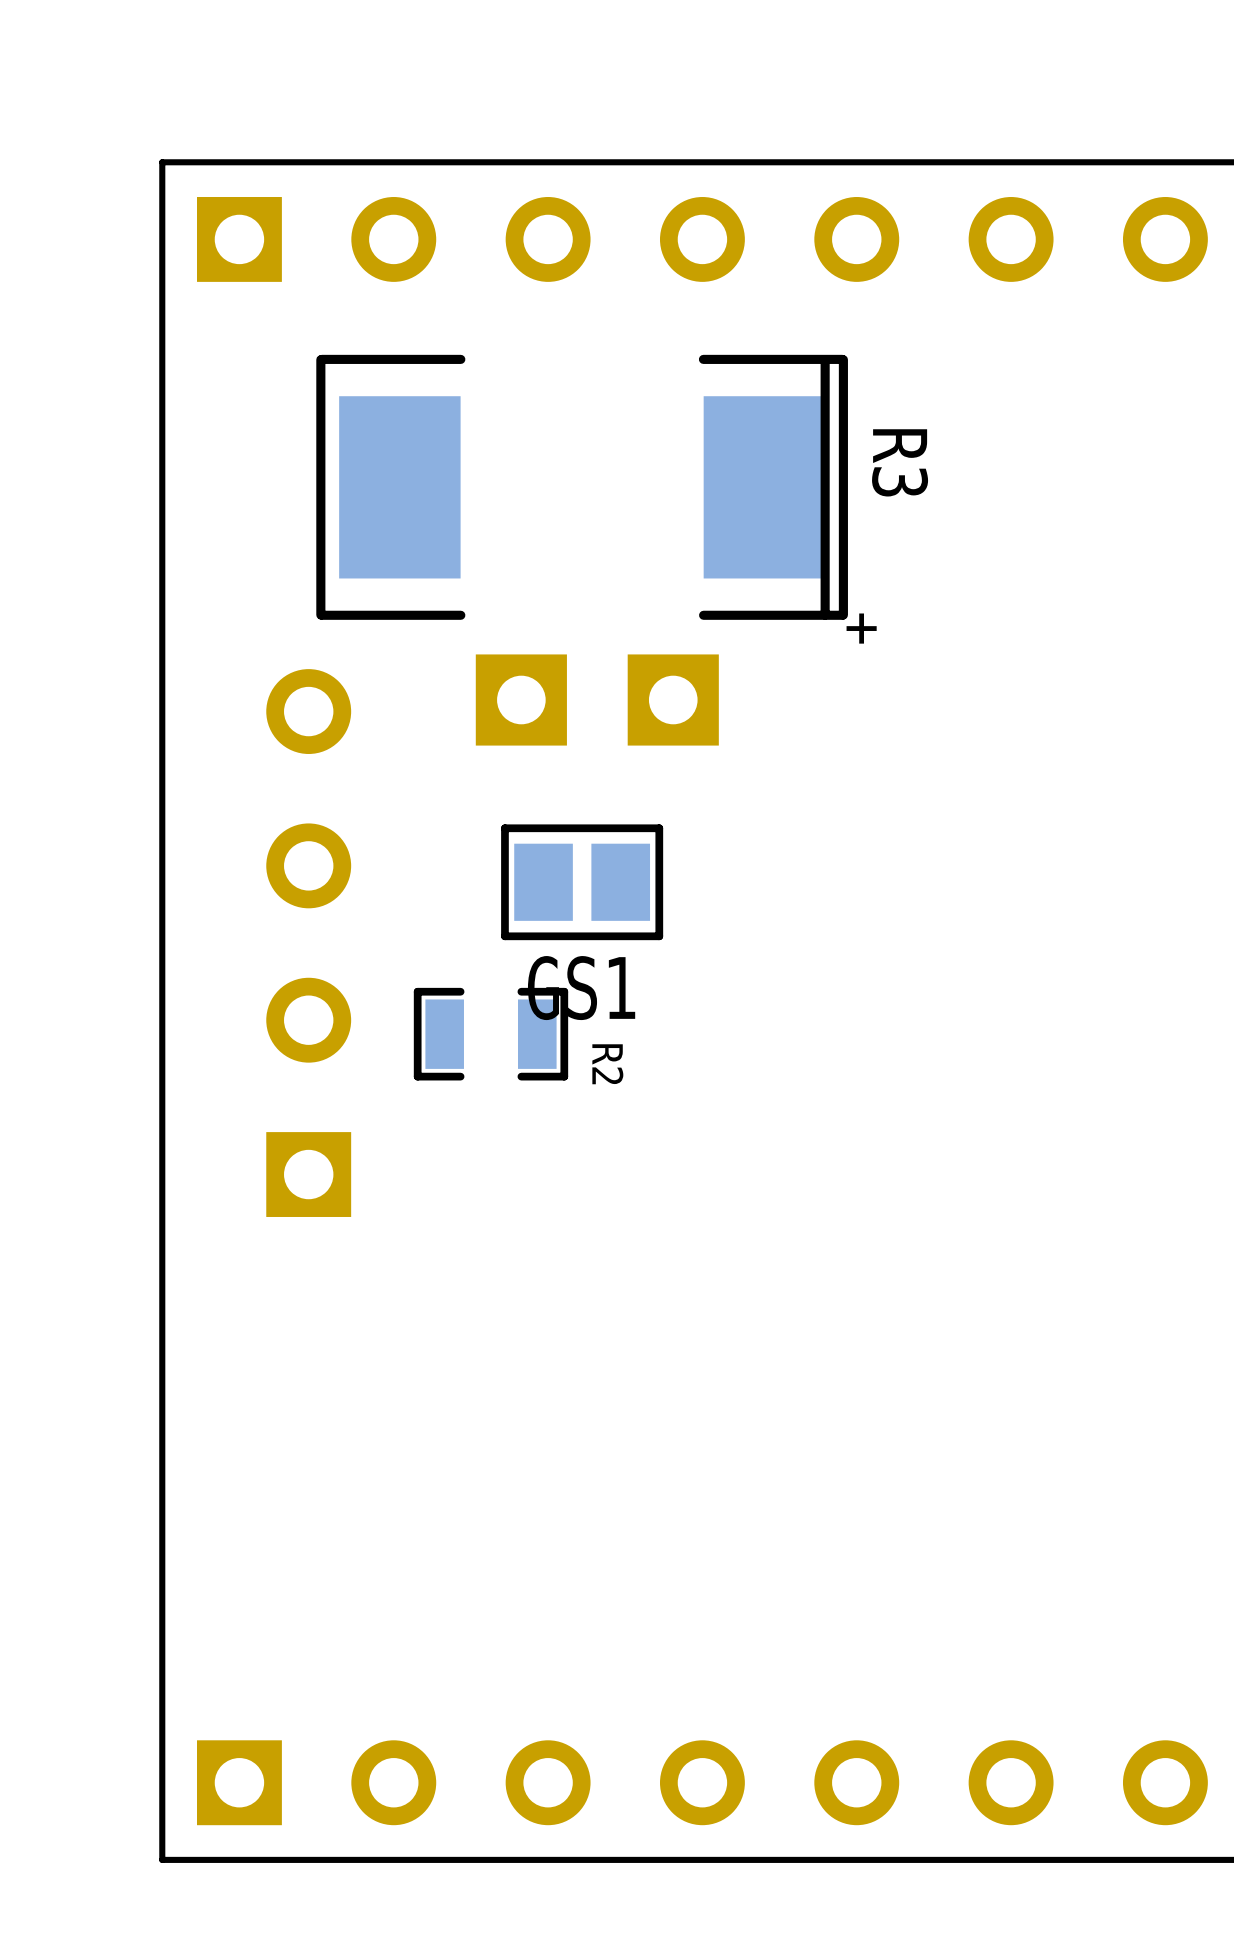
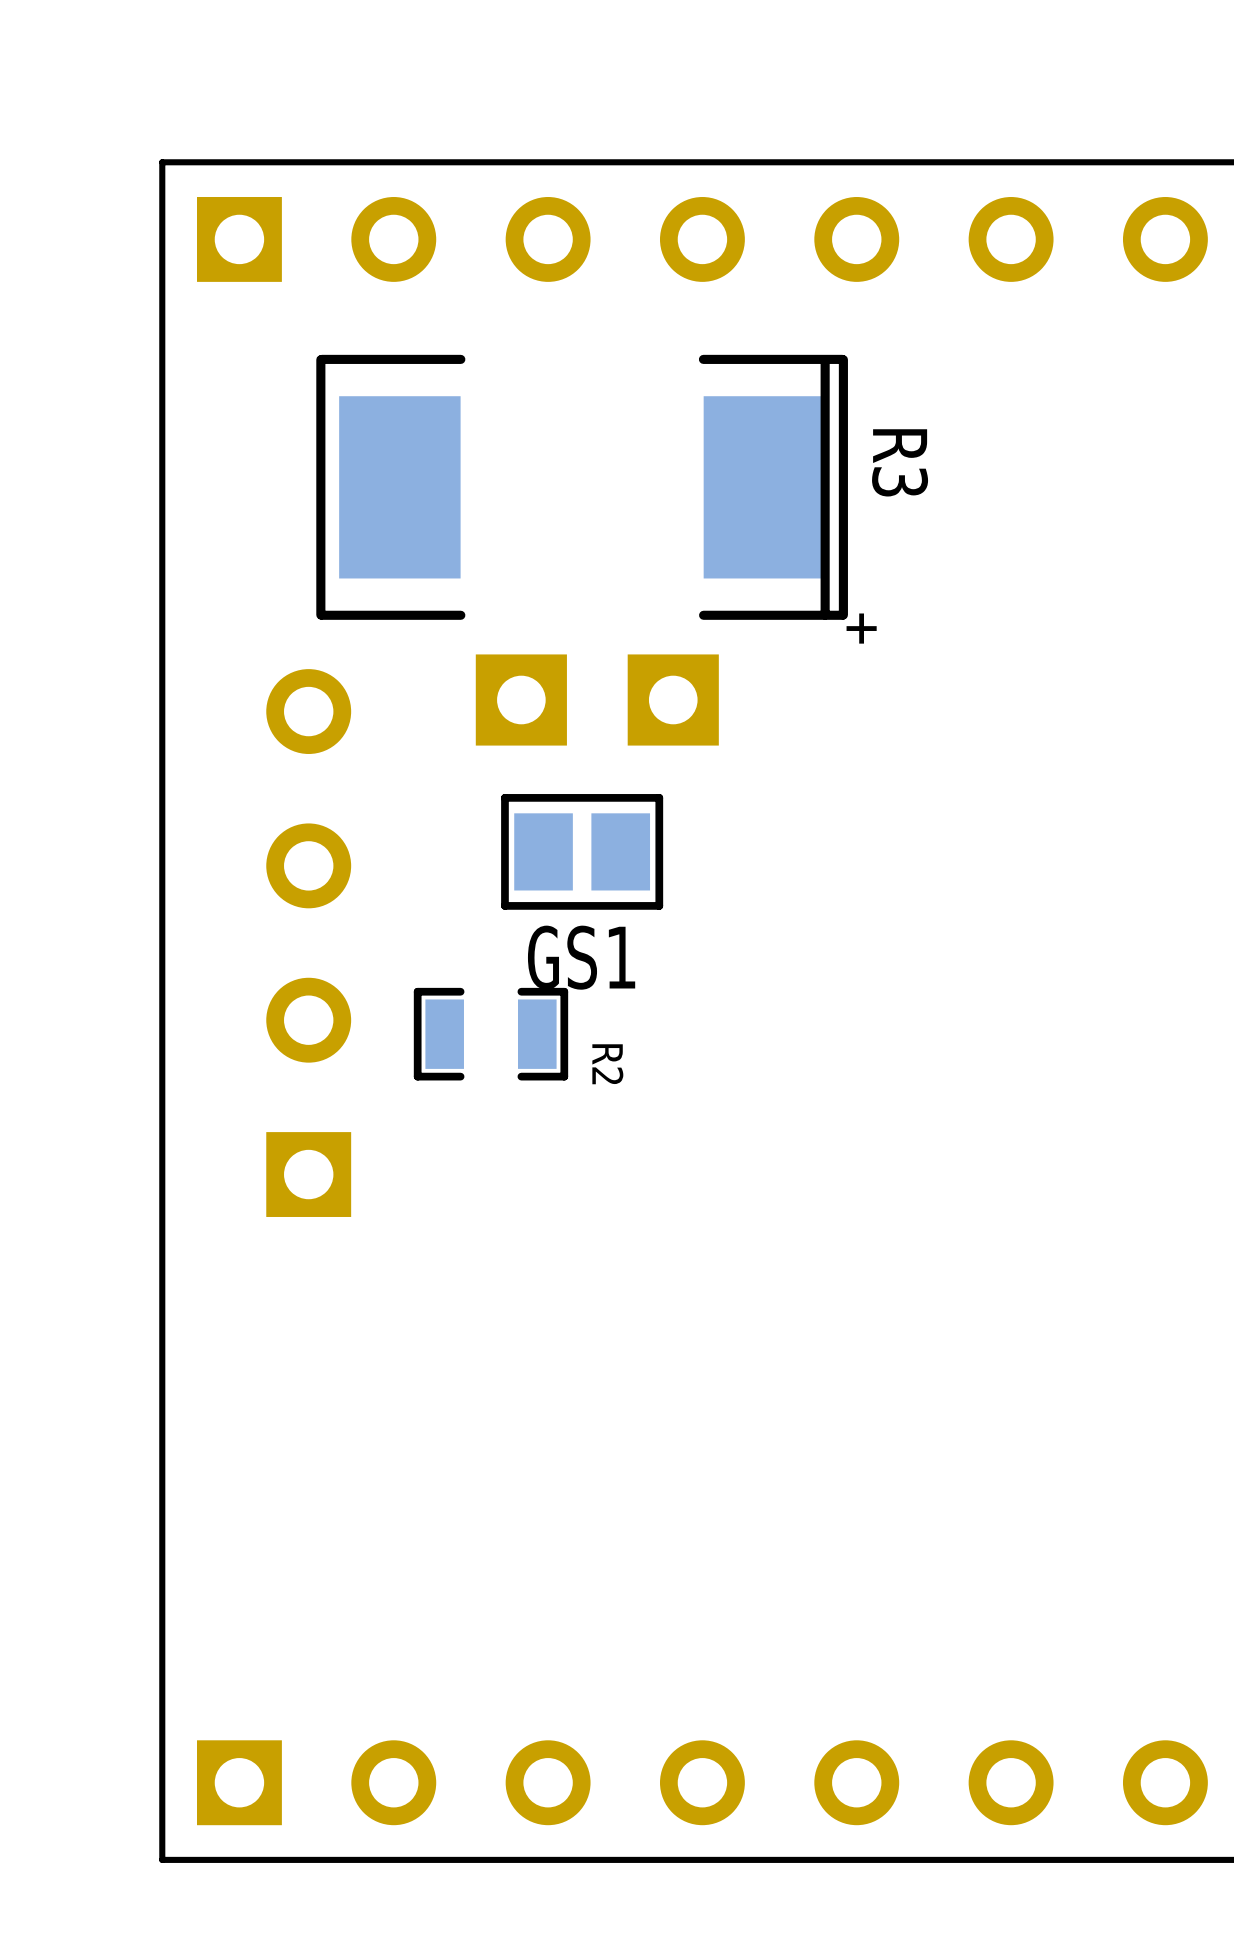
GS1 position: (582, 882) -> (582, 851)

